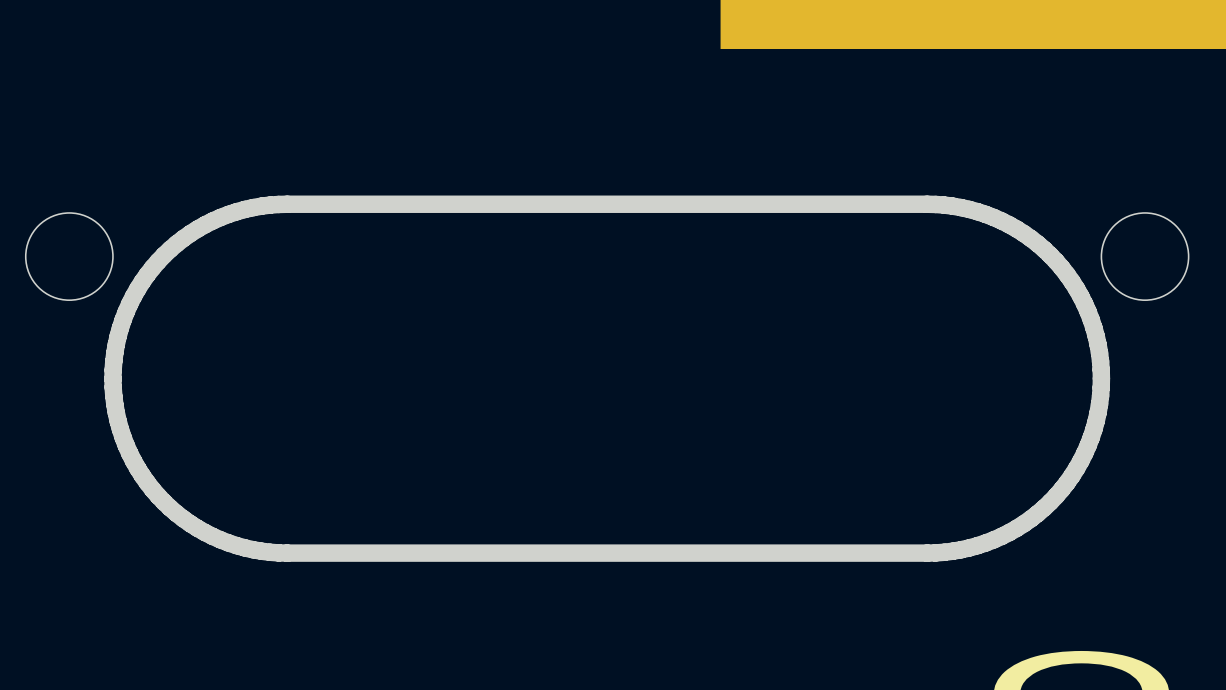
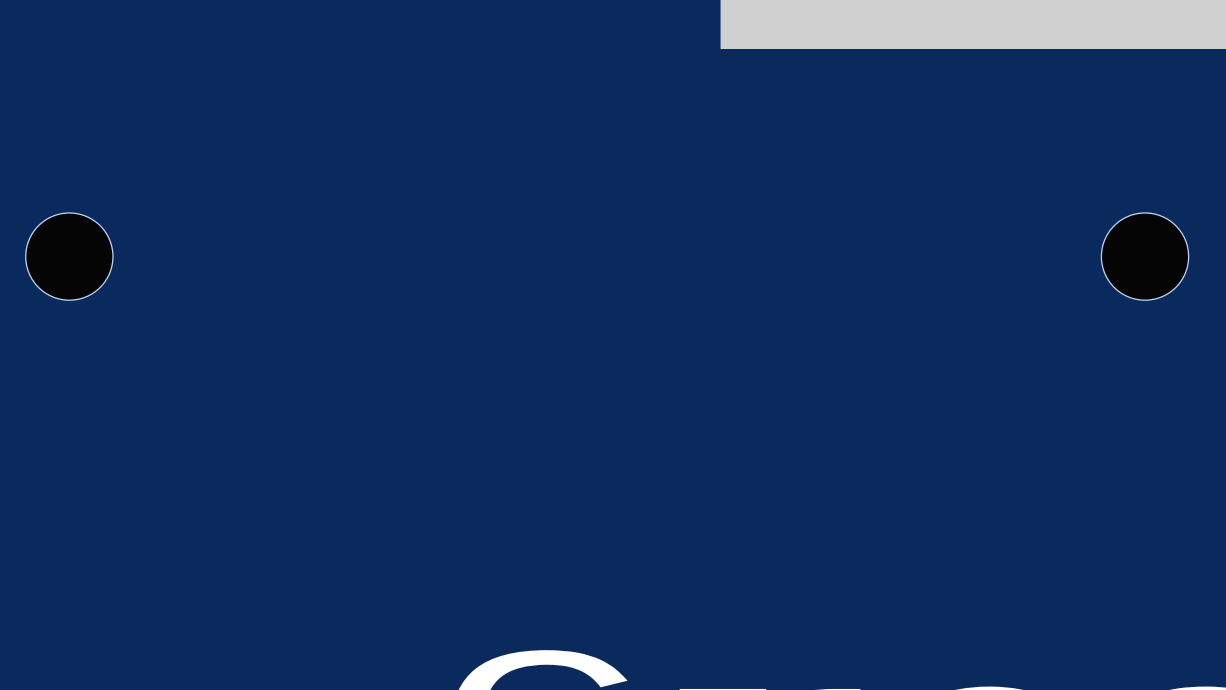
board edge: (270, 205) (236, 211) (212, 220) (183, 238) (163, 255) (142, 281) (126, 311) (118, 336) (113, 369) (113, 395) (120, 429) (133, 461) (147, 482) (163, 502) (190, 523) (212, 536) (244, 547) (287, 553) (927, 553) (952, 551) (977, 545) (1001, 536) (1023, 523) (1044, 507) (1061, 489) (1076, 468) (1088, 445) (1096, 421) (1101, 387) (1099, 352) (1091, 319) (1076, 288) (1056, 261) (1030, 238) (1001, 220) (969, 209) (927, 204) (270, 205) -> none

